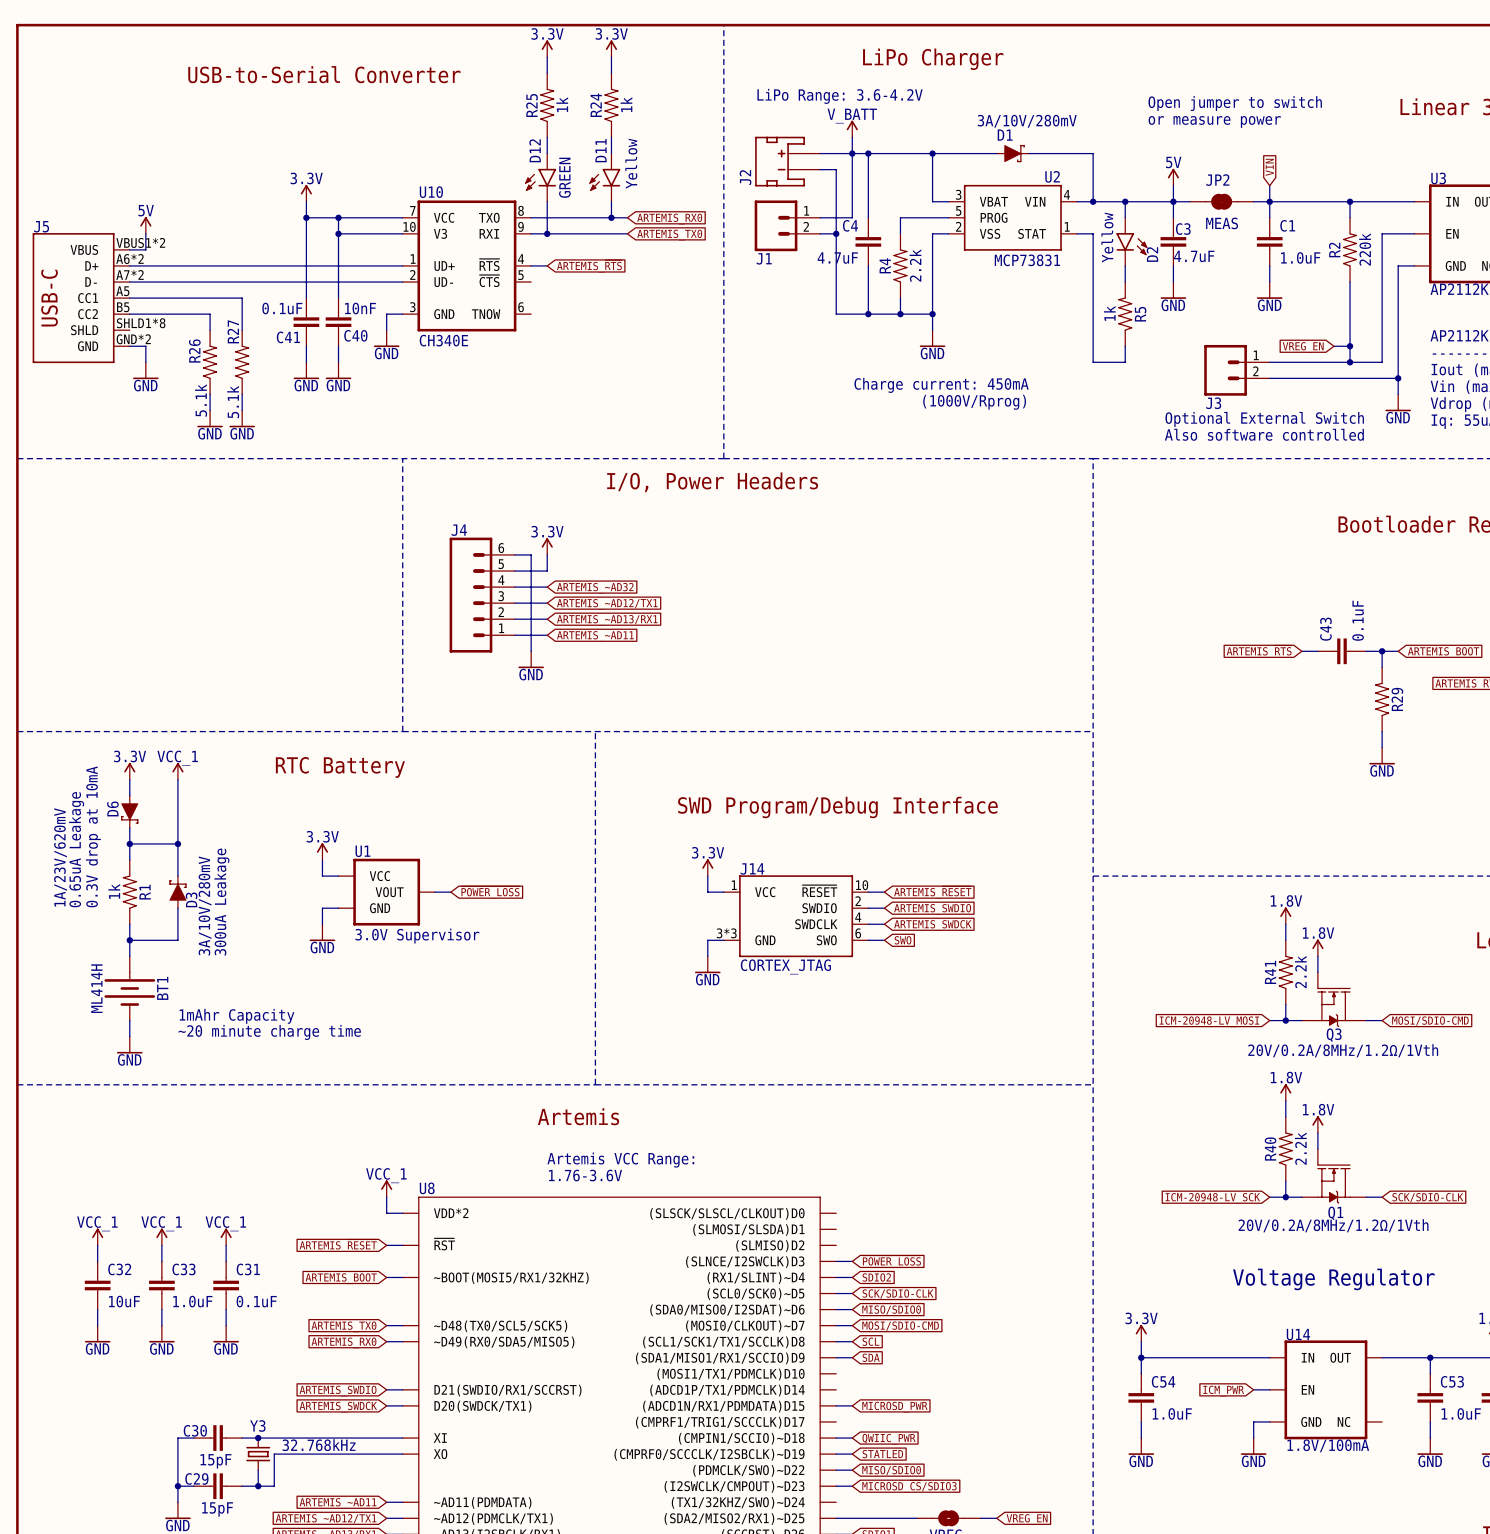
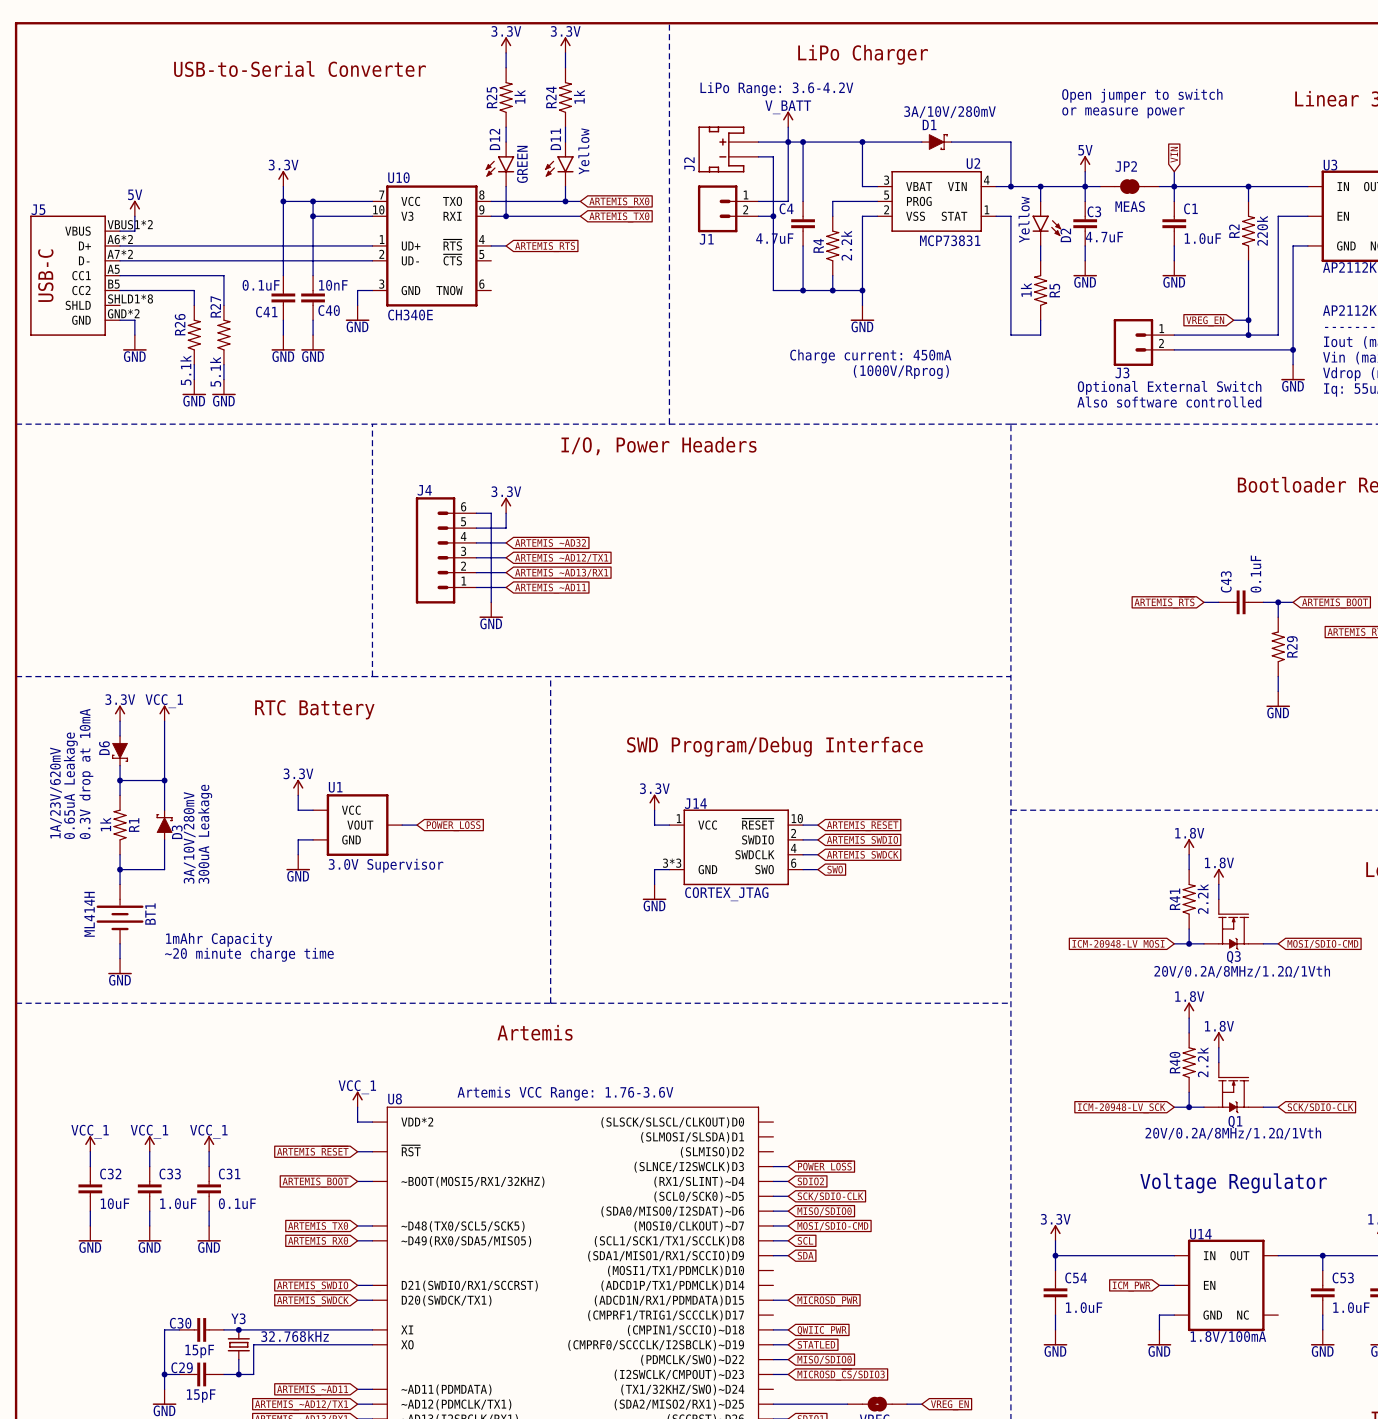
text: Artemis VCC Range: (620, 1160) -> Artemis VCC Range: 1.76-3.6V (565, 1093)
text: 1.76-3.6V (585, 1175) -> none

